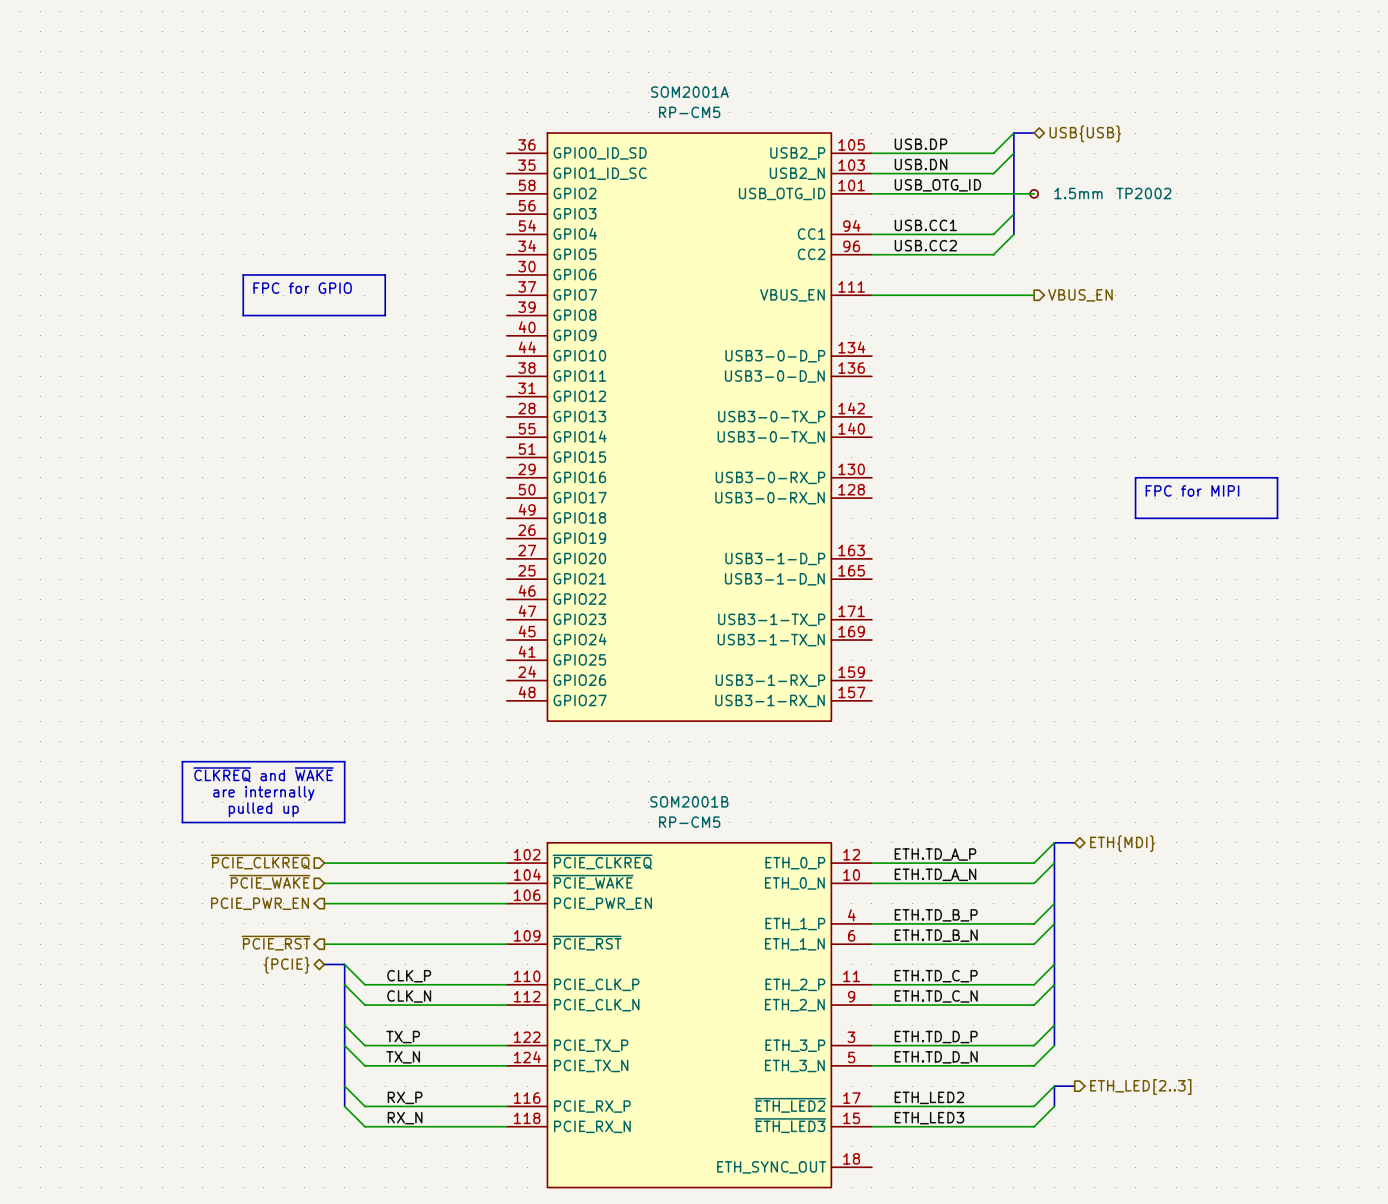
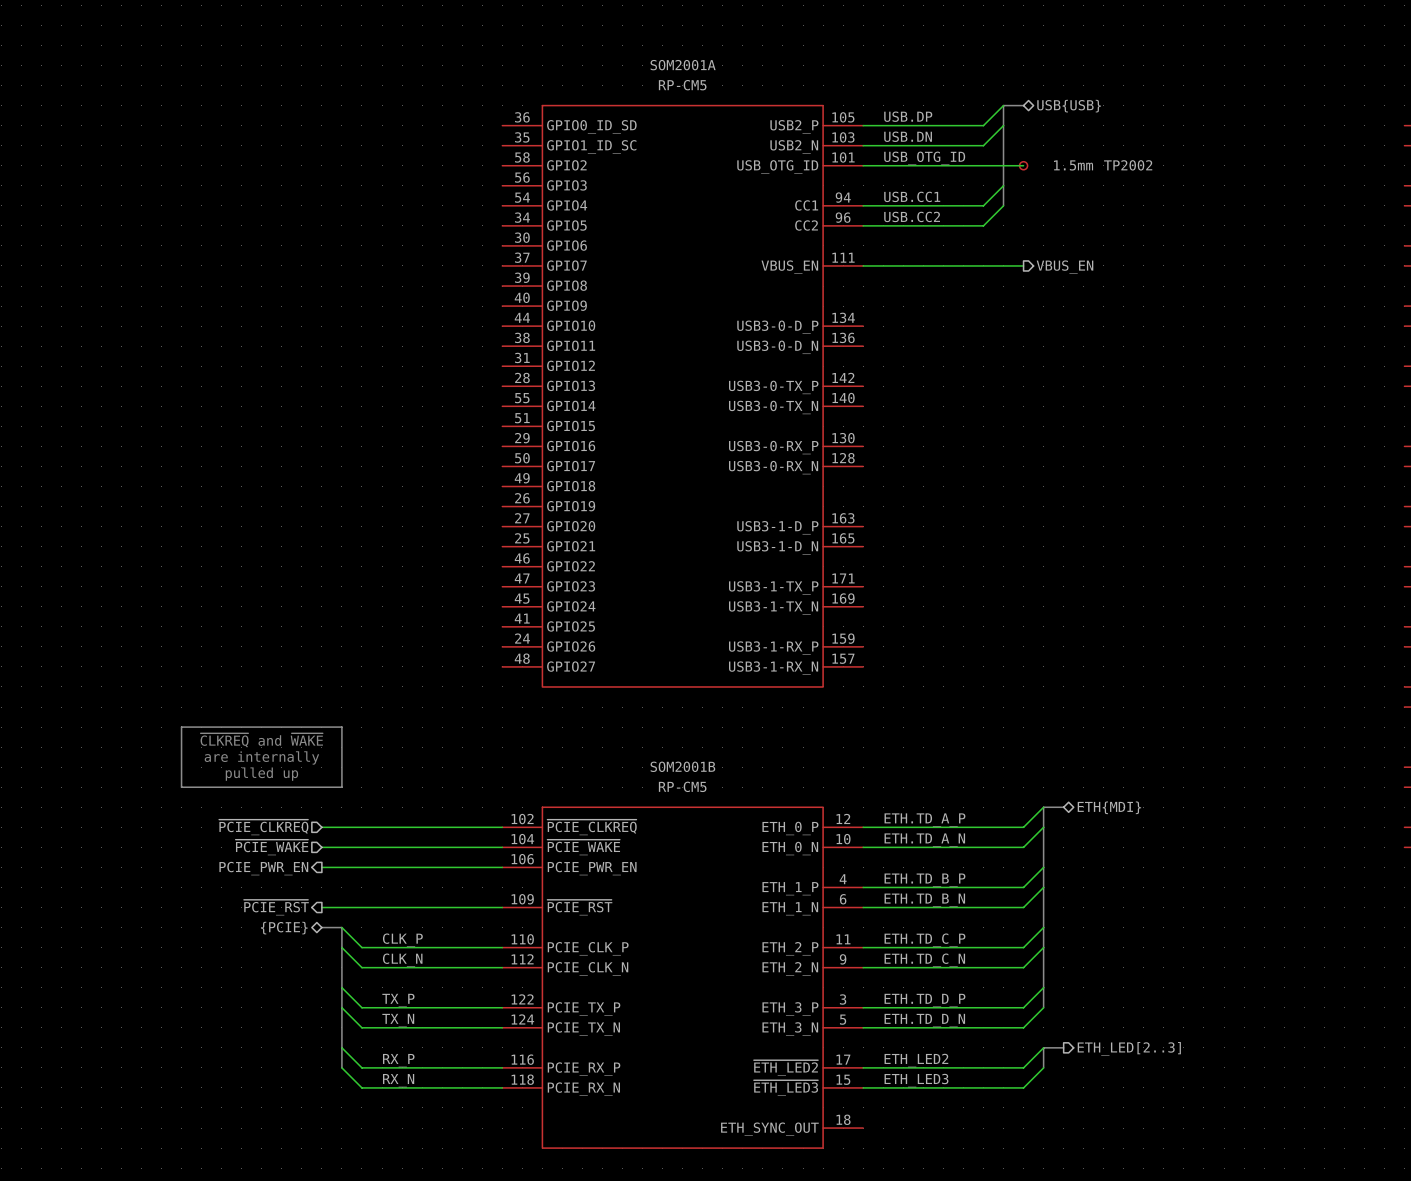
line: (243, 274) (385, 274) (385, 315) (243, 315) (243, 274) -> none
text: FPC for GPIO (302, 288) -> none
line: (1135, 477) (1277, 477) (1277, 518) (1135, 518) (1135, 477) -> none
text: FPC for MIPI (1192, 490) -> none

